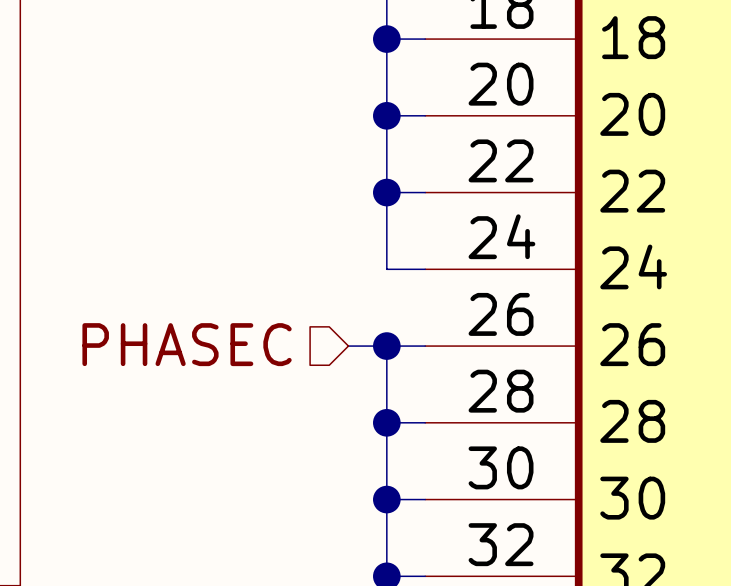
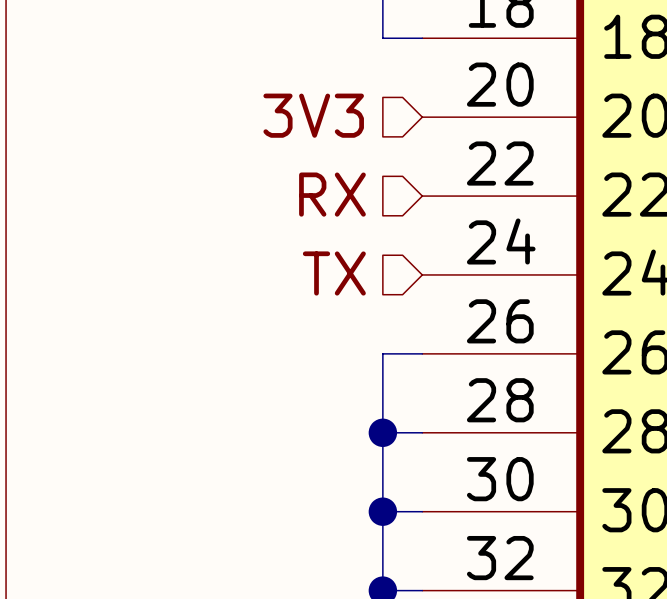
wire: (386, 39) (386, 269) (425, 269) -> none
junction: (386, 39) -> none
hierarchical label: none -> 3V3 (313, 115)
wire: (386, 115) (425, 115) -> none
junction: (386, 115) -> none
hierarchical label: none -> RX (332, 194)
wire: (386, 192) (425, 192) -> none
junction: (386, 192) -> none
hierarchical label: none -> TX (334, 273)
hierarchical label: PHASEC (187, 344) -> none
wire: (348, 346) (386, 346) -> none
junction: (386, 346) -> none

